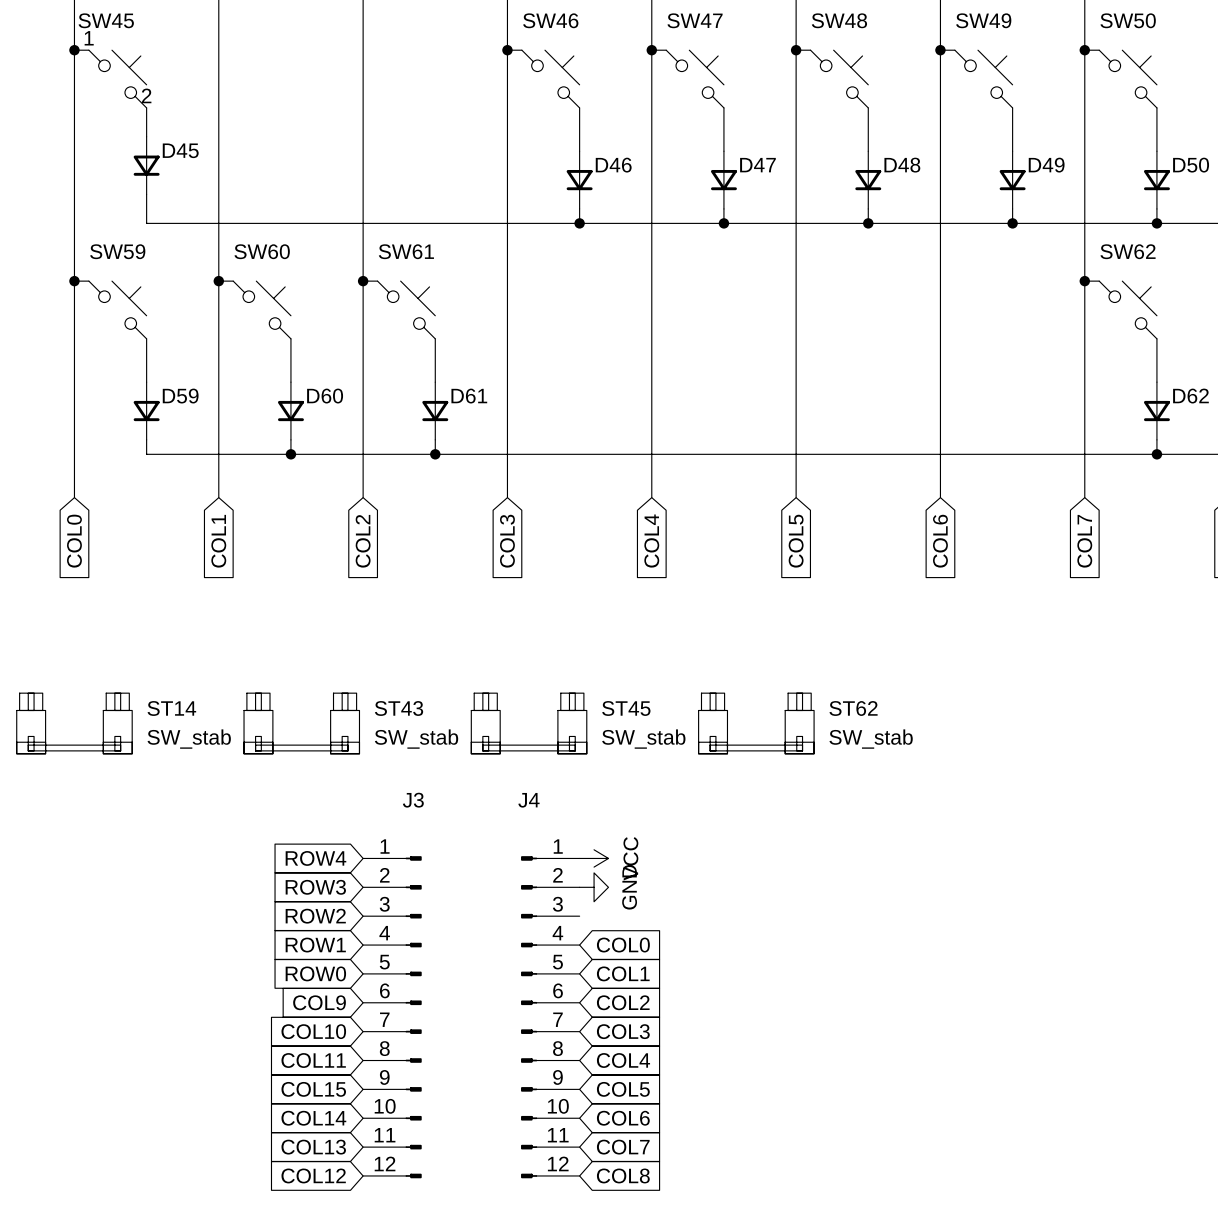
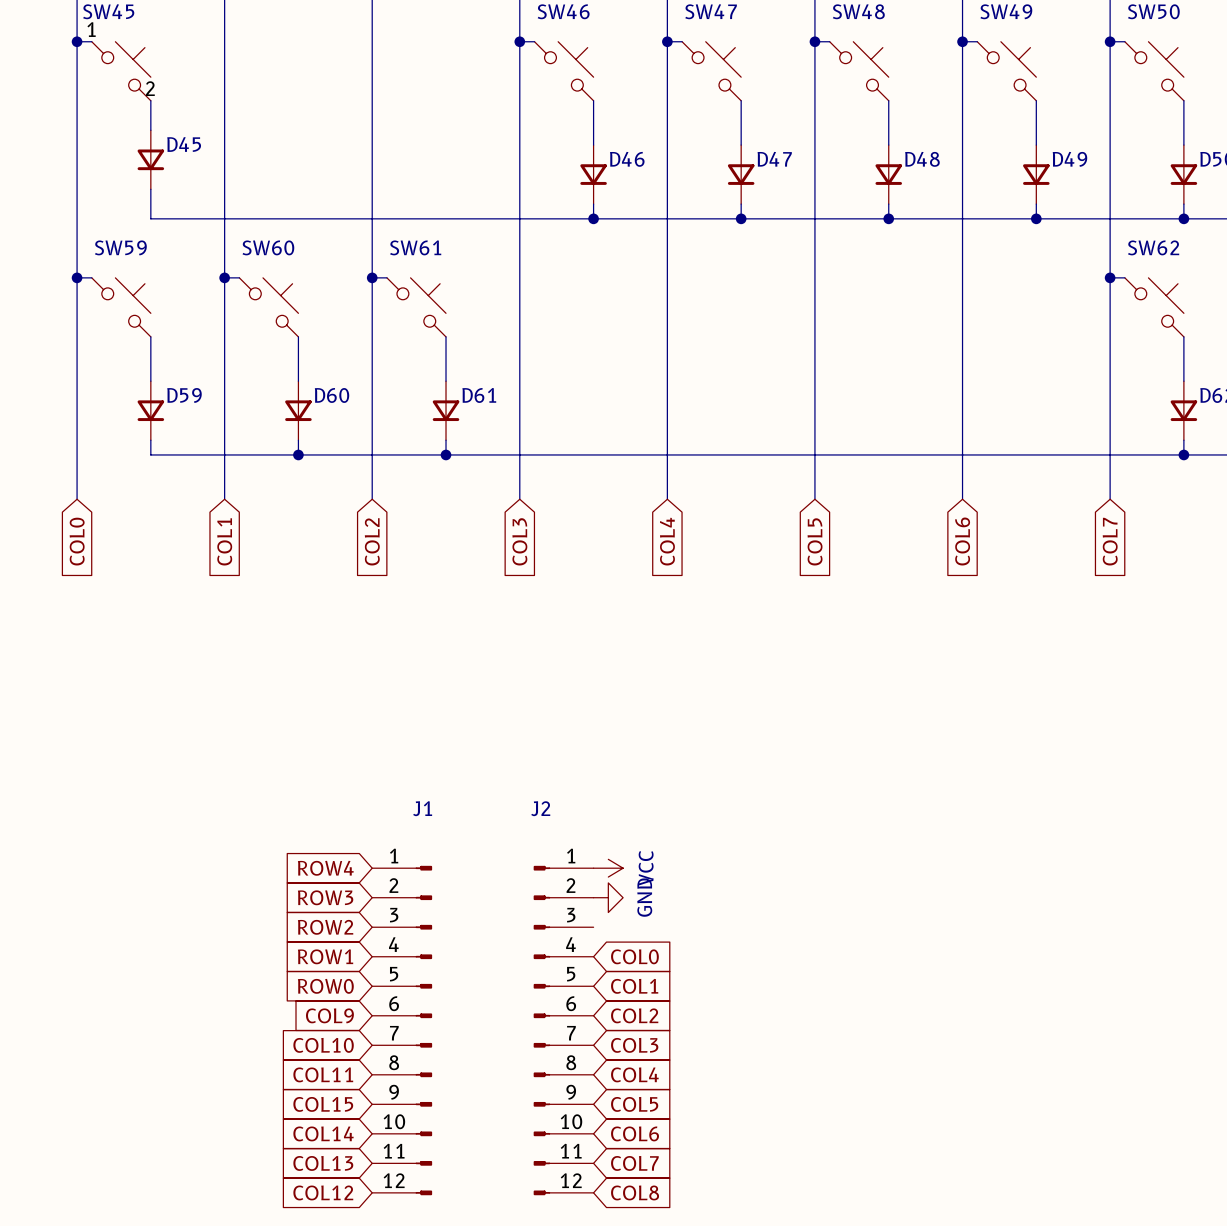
ST14: SW_stab (74, 723) -> none
ST43: SW_stab (301, 723) -> none
ST45: SW_stab (529, 723) -> none
ST62: SW_stab (756, 723) -> none
J3 name: J3 (413, 800) -> J1 (422, 808)
J4 name: J4 (528, 800) -> J2 (540, 808)

